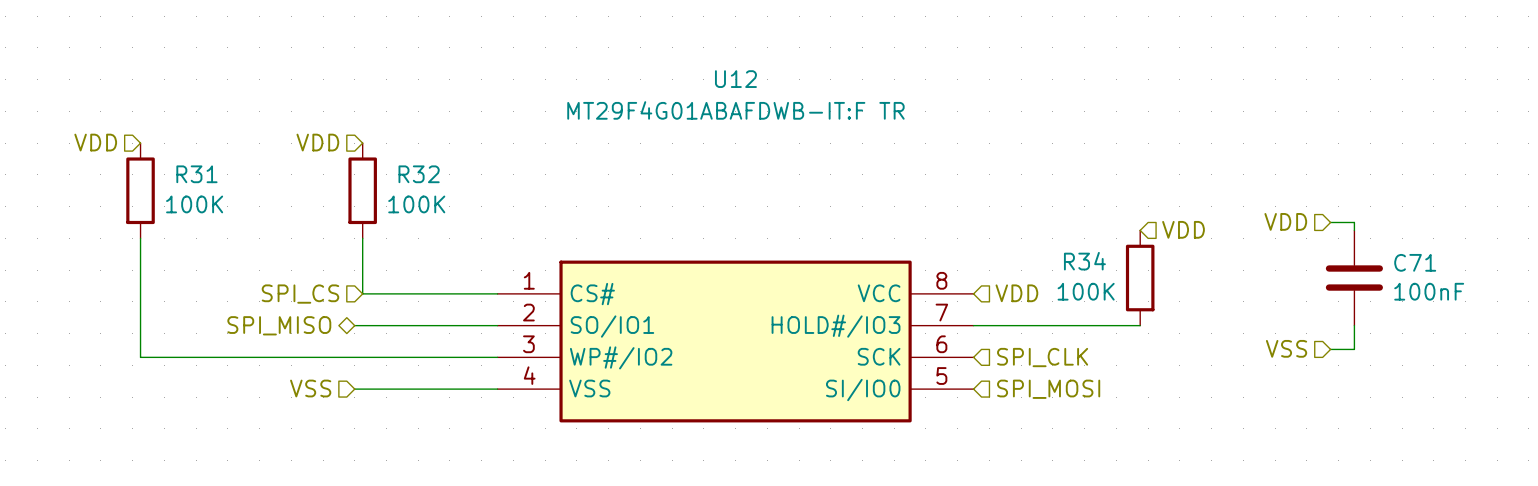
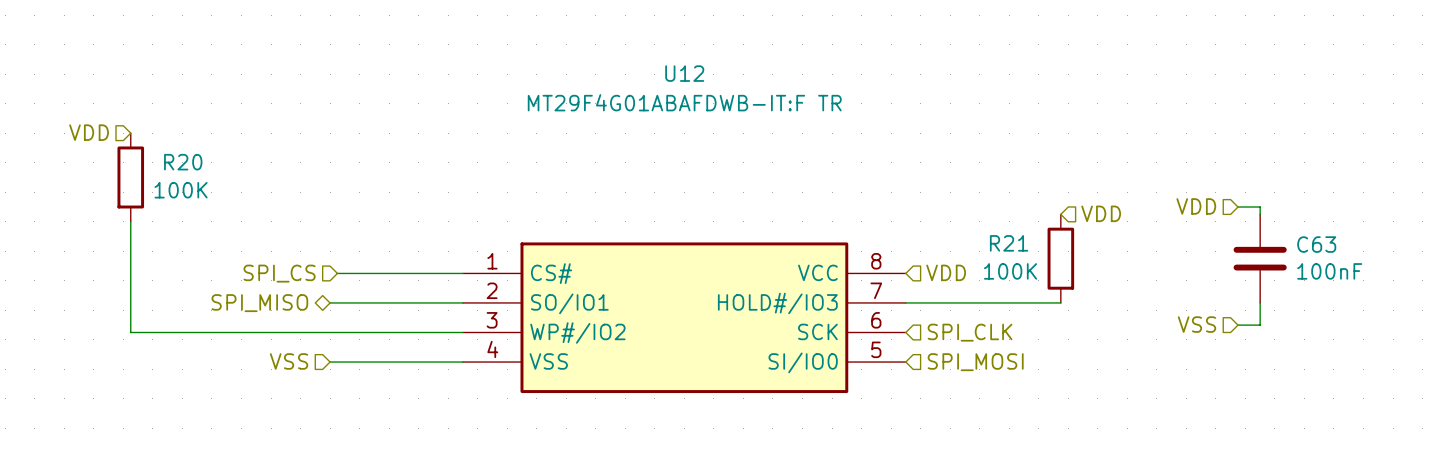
hierarchical label: VDD (317, 142) -> none
R31 name: R31 (196, 174) -> R20 (183, 162)
R32: 100K (362, 190) -> none
wire: (362, 238) (362, 293) -> none
R34 name: R34 (1084, 261) -> R21 (1009, 243)
C71 name: C71 (1415, 262) -> C63 (1316, 244)

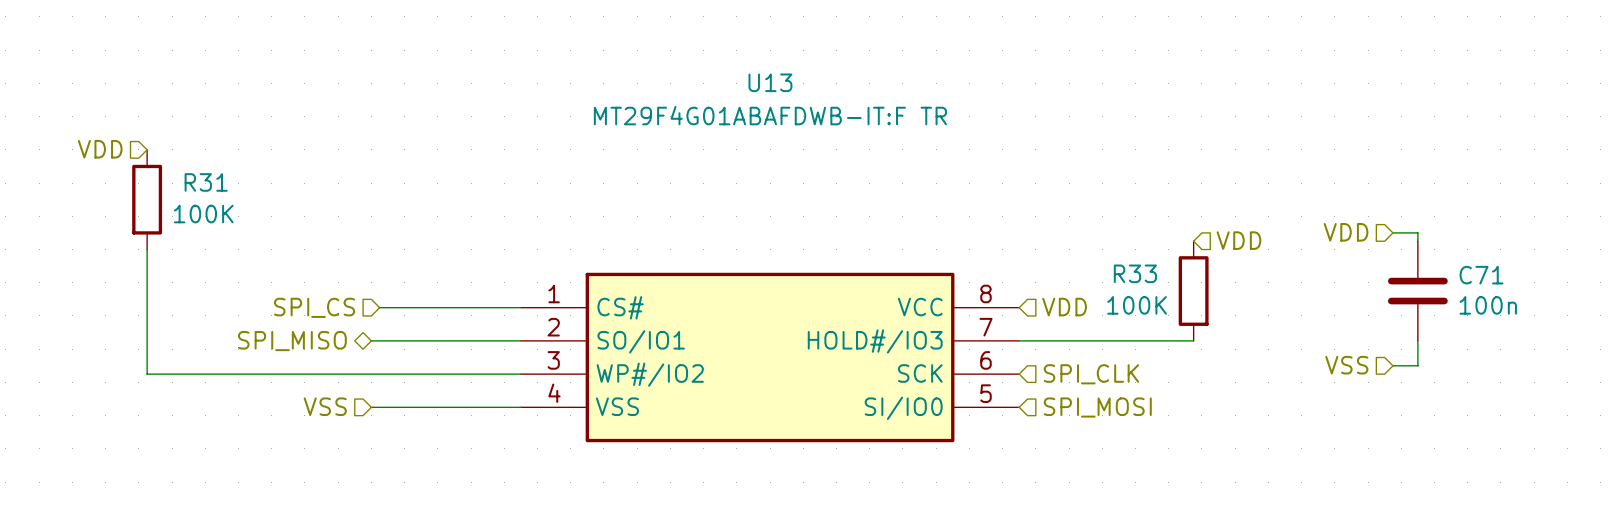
U12 name: U12 (684, 73) -> U13 (770, 82)
R20 name: R20 (183, 162) -> R31 (206, 182)
R21 name: R21 (1009, 243) -> R33 (1135, 273)
C63 name: C63 (1316, 244) -> C71 (1481, 275)
C63 value: 100nF (1329, 271) -> 100n (1488, 305)

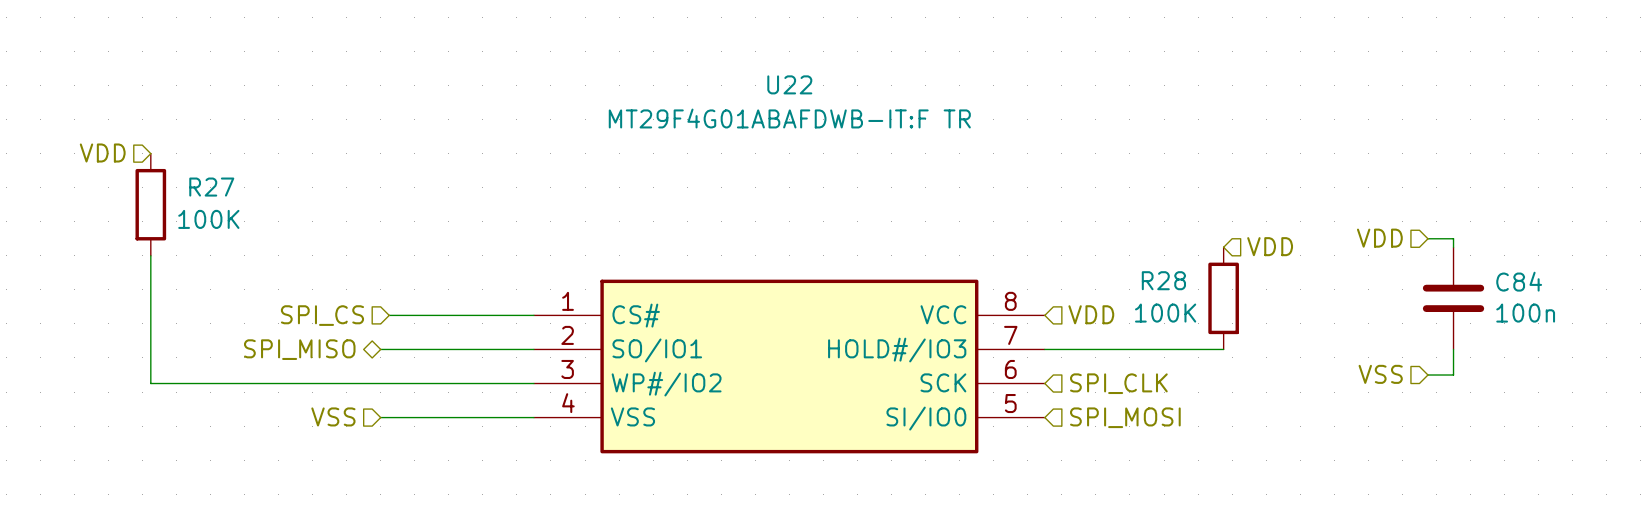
U13 name: U13 (770, 82) -> U22 (789, 84)
R31 name: R31 (206, 182) -> R27 (211, 187)
R33 name: R33 (1135, 273) -> R28 (1163, 280)
C71 name: C71 (1481, 275) -> C84 (1519, 281)

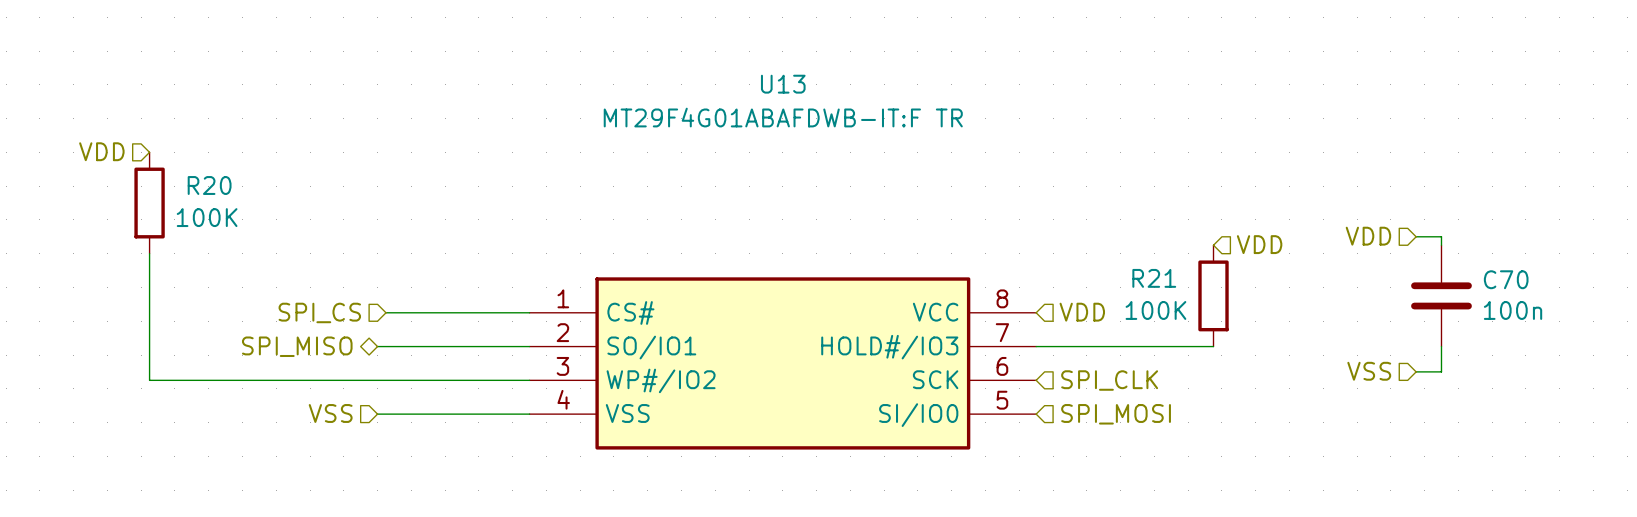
U22 name: U22 (789, 84) -> U13 (783, 84)
R27 name: R27 (211, 187) -> R20 (209, 185)
R28 name: R28 (1163, 280) -> R21 (1154, 278)
C84 name: C84 (1519, 281) -> C70 (1506, 279)

